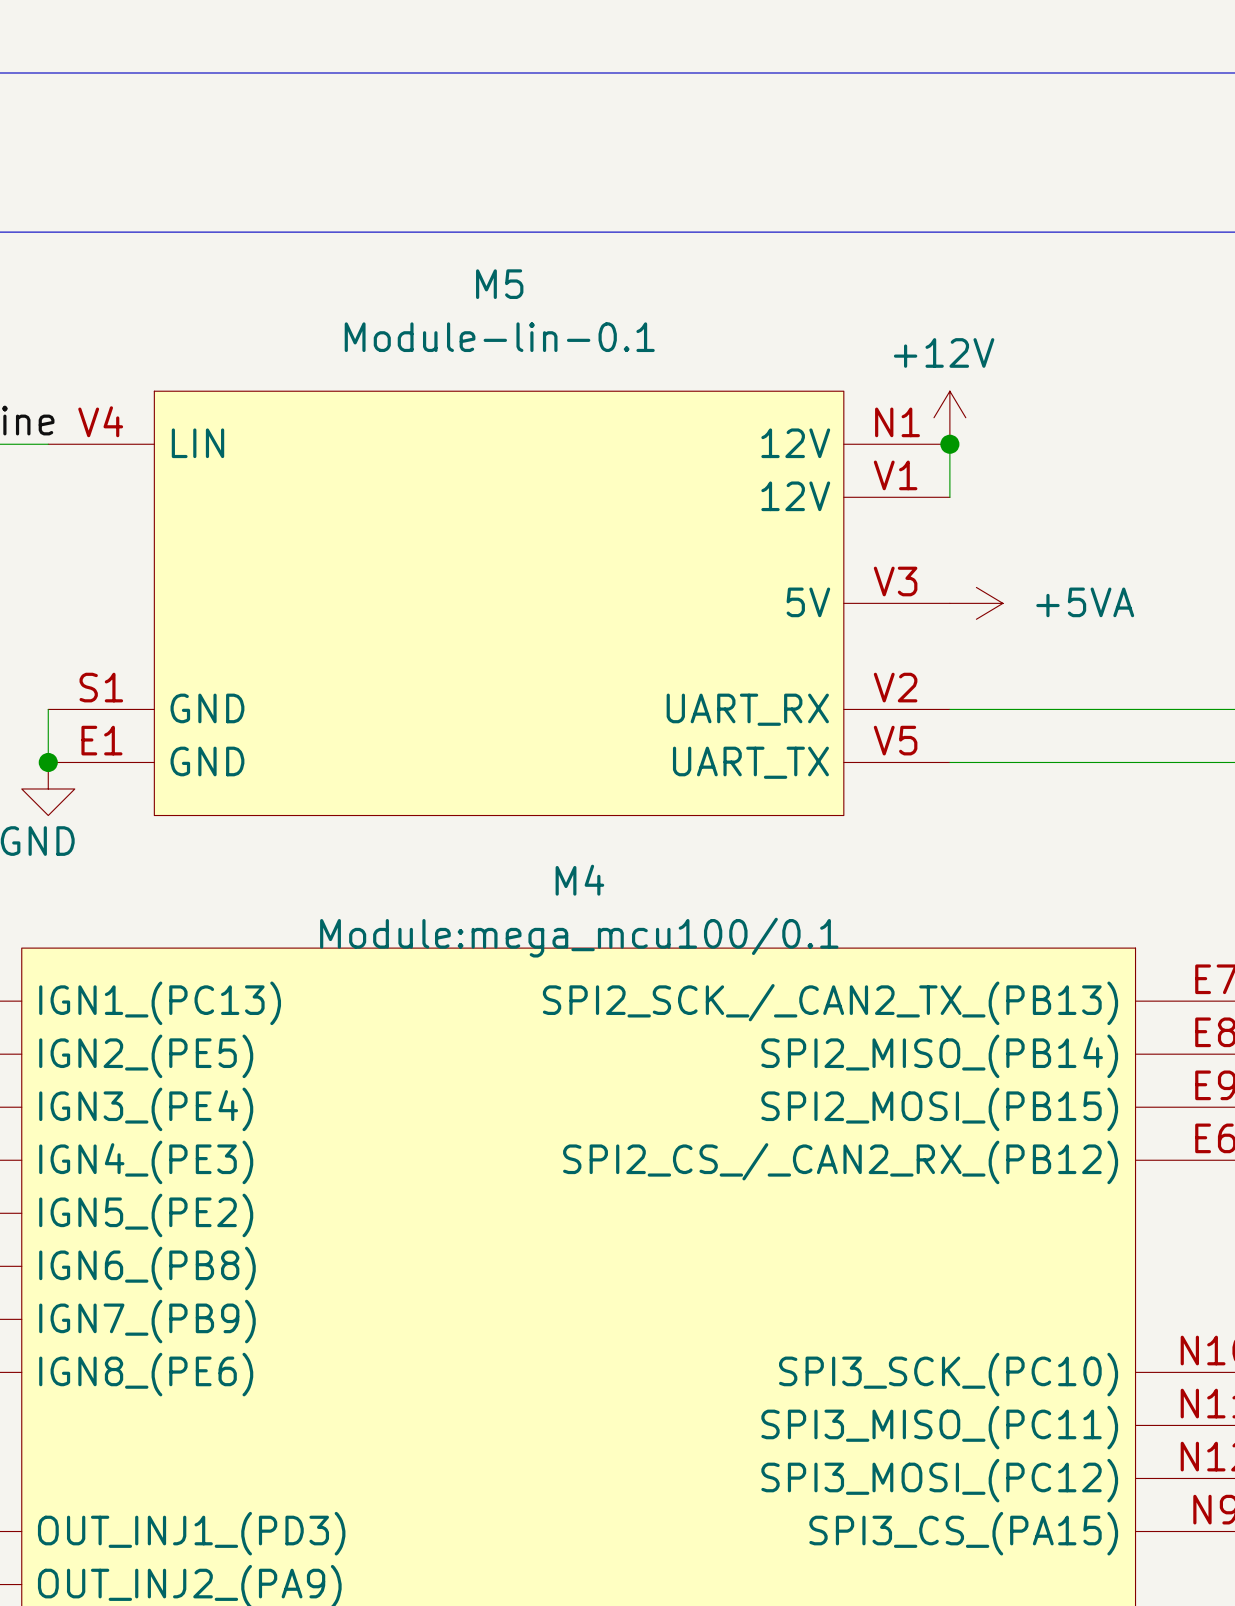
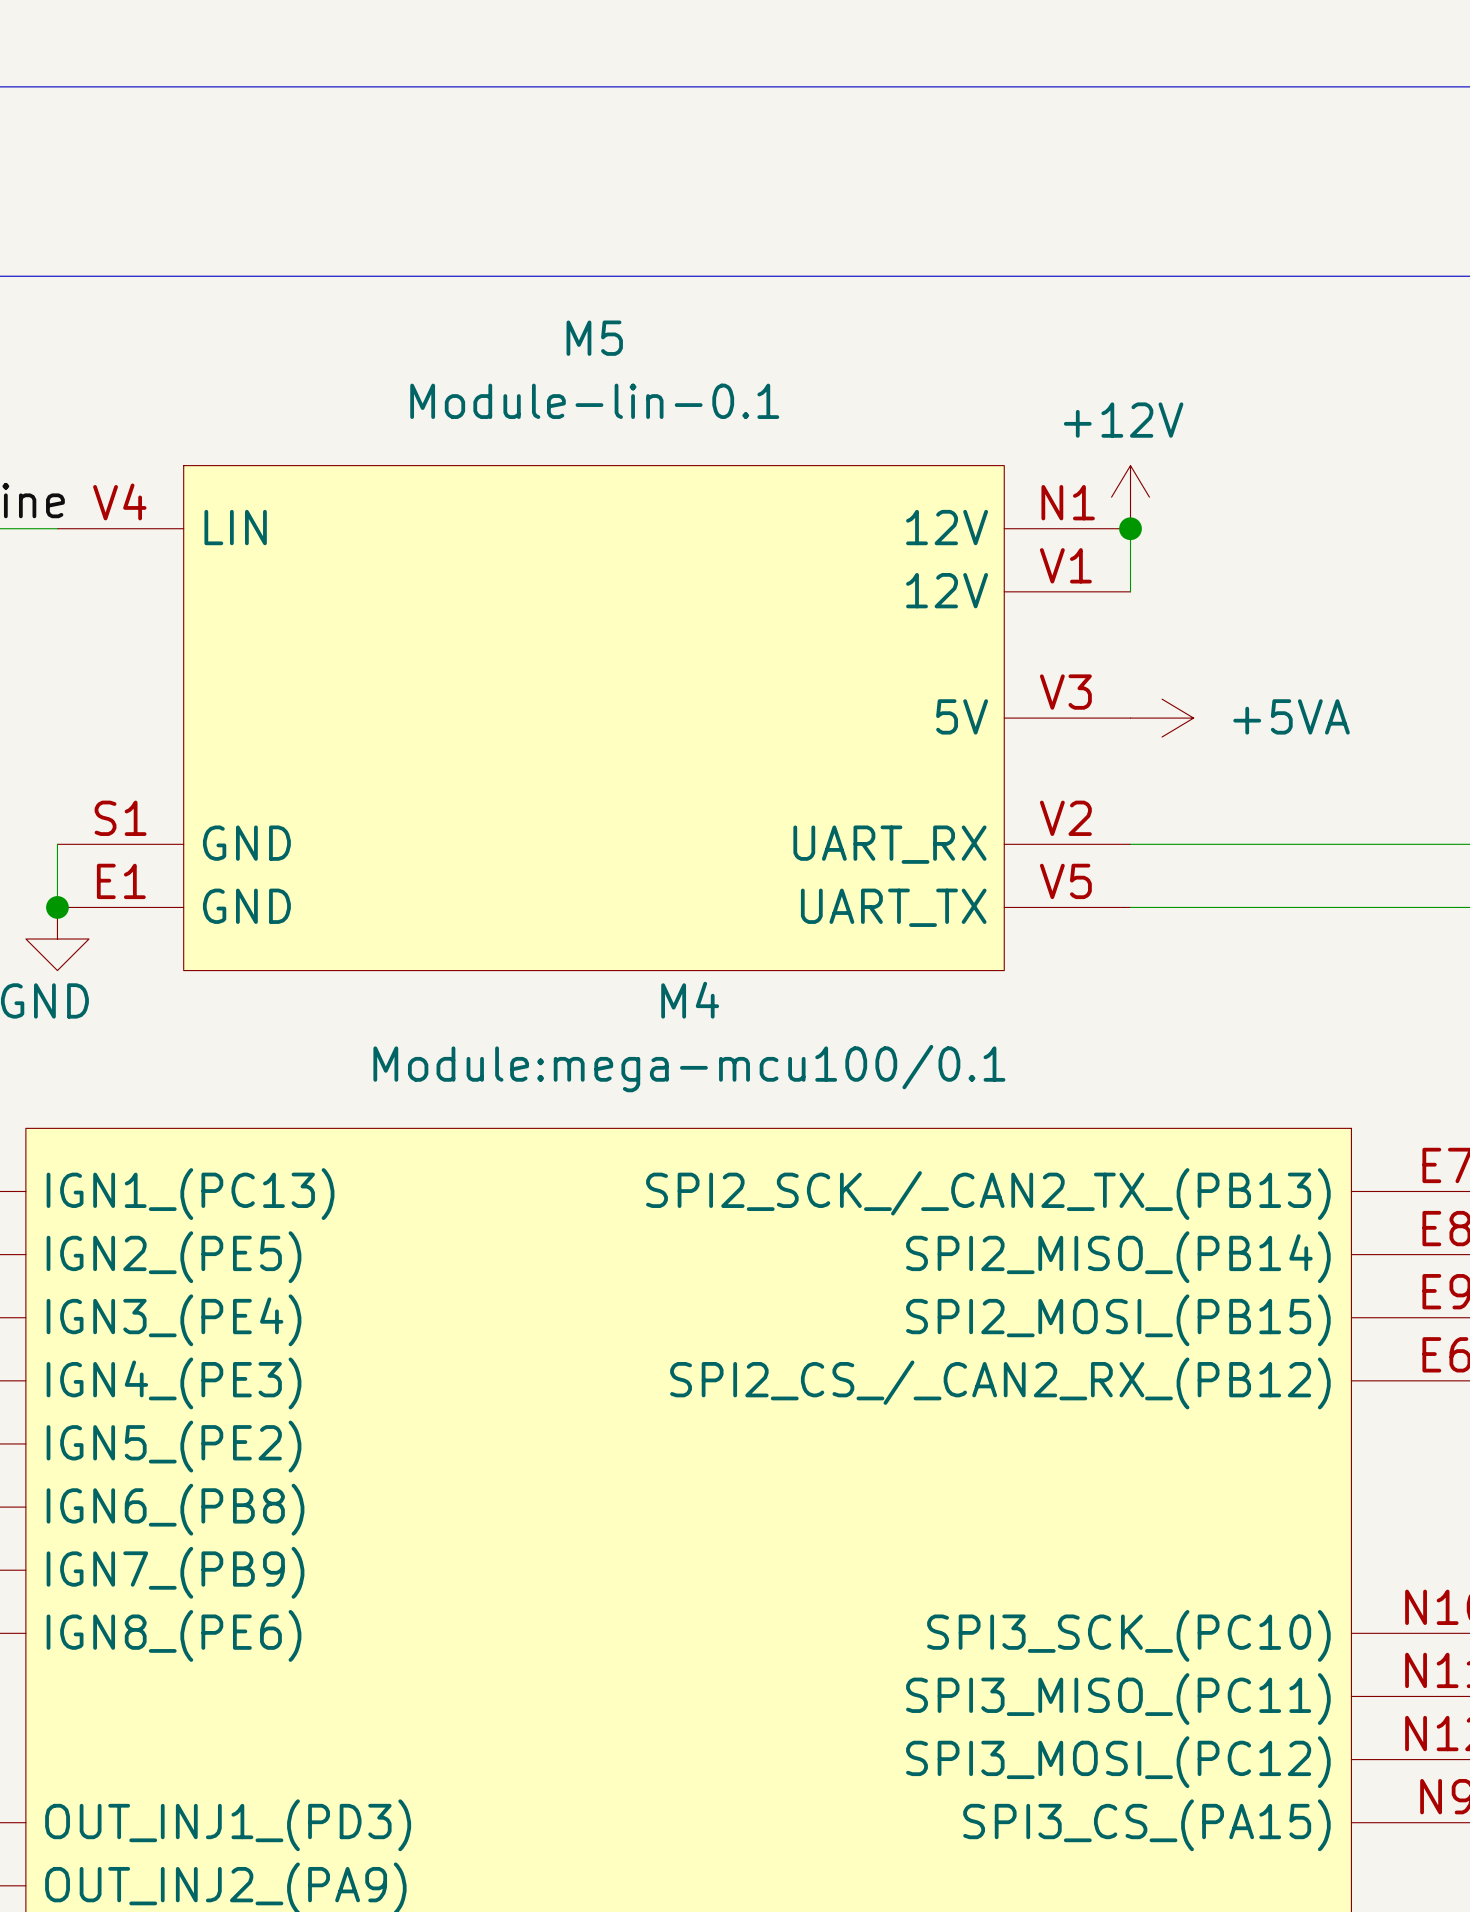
M4 name position: M4 (579, 880) -> M4 (690, 1000)
M4 value: Module:mega_mcu100/0.1 (579, 937) -> Module:mega-mcu100/0.1 (689, 1068)

